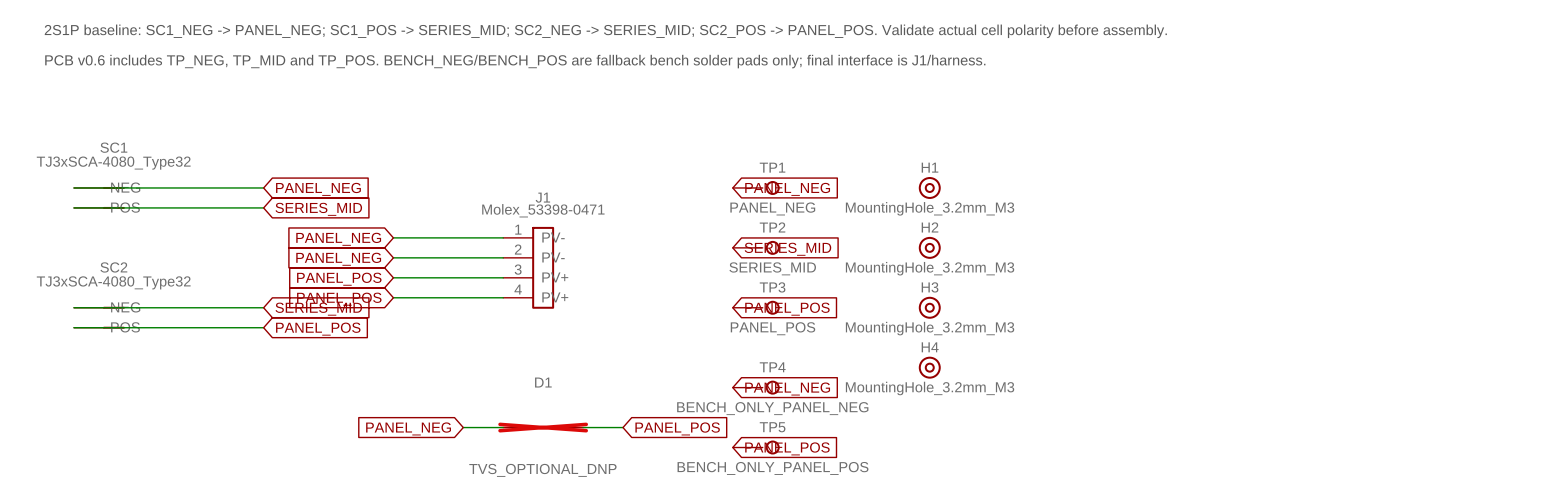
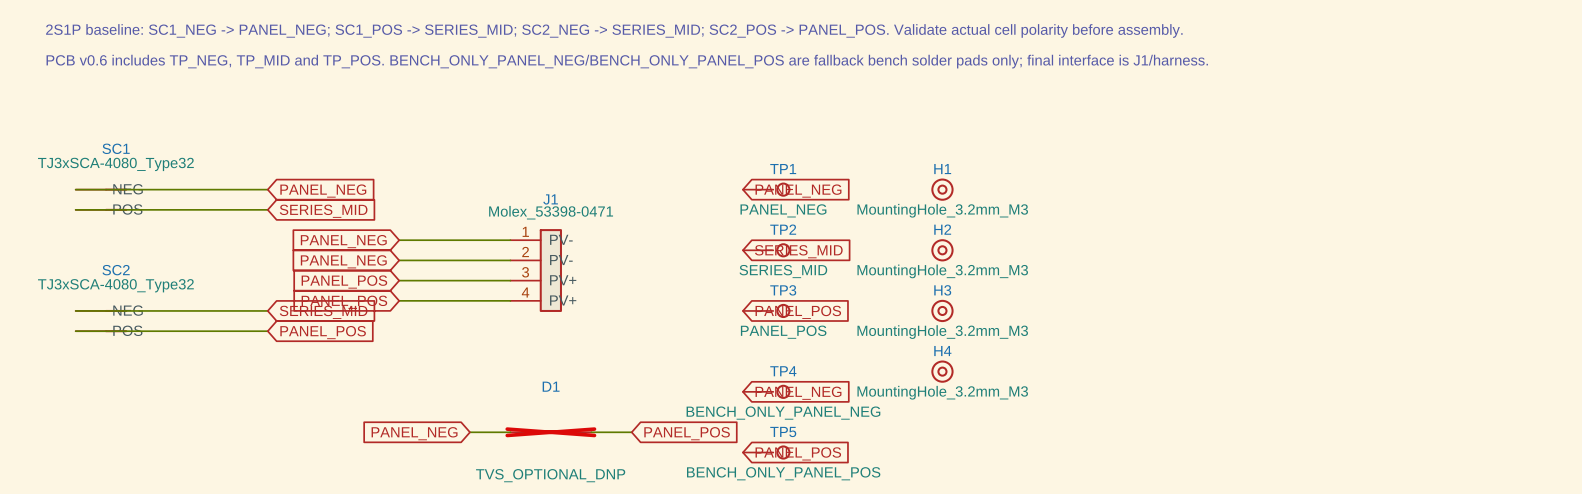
text: PCB v0.6 includes TP_NEG, TP_MID and TP_POS. BENCH_NEG/BENCH_POS are fallback bench solder pads only; final interface is J1/harness. (515, 61) -> PCB v0.6 includes TP_NEG, TP_MID and TP_POS. BENCH_ONLY_PANEL_NEG/BENCH_ONLY_PANEL_POS are fallback bench solder pads only; final interface is J1/harness. (627, 61)

